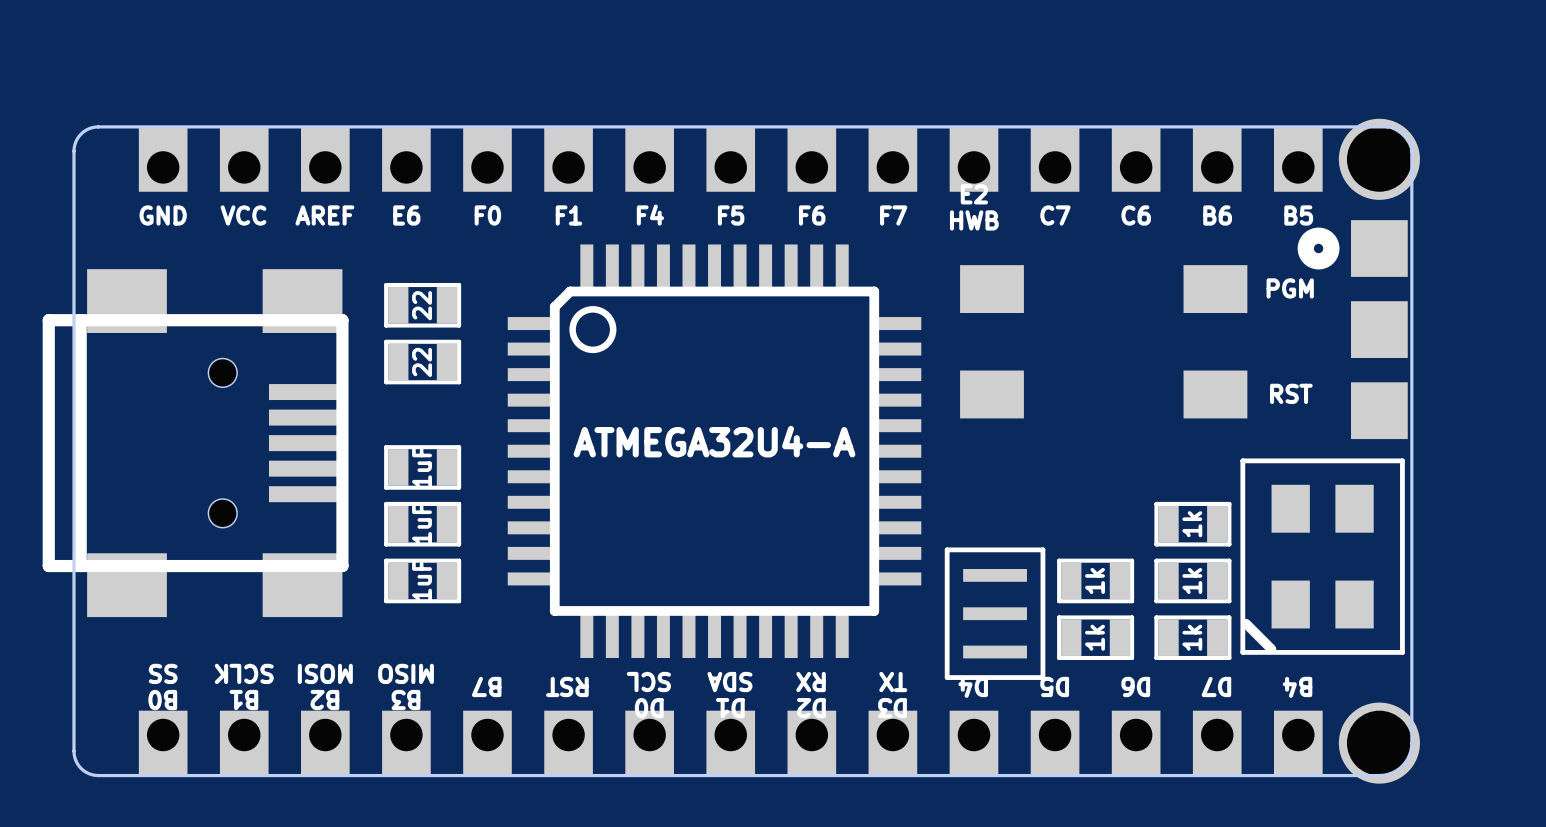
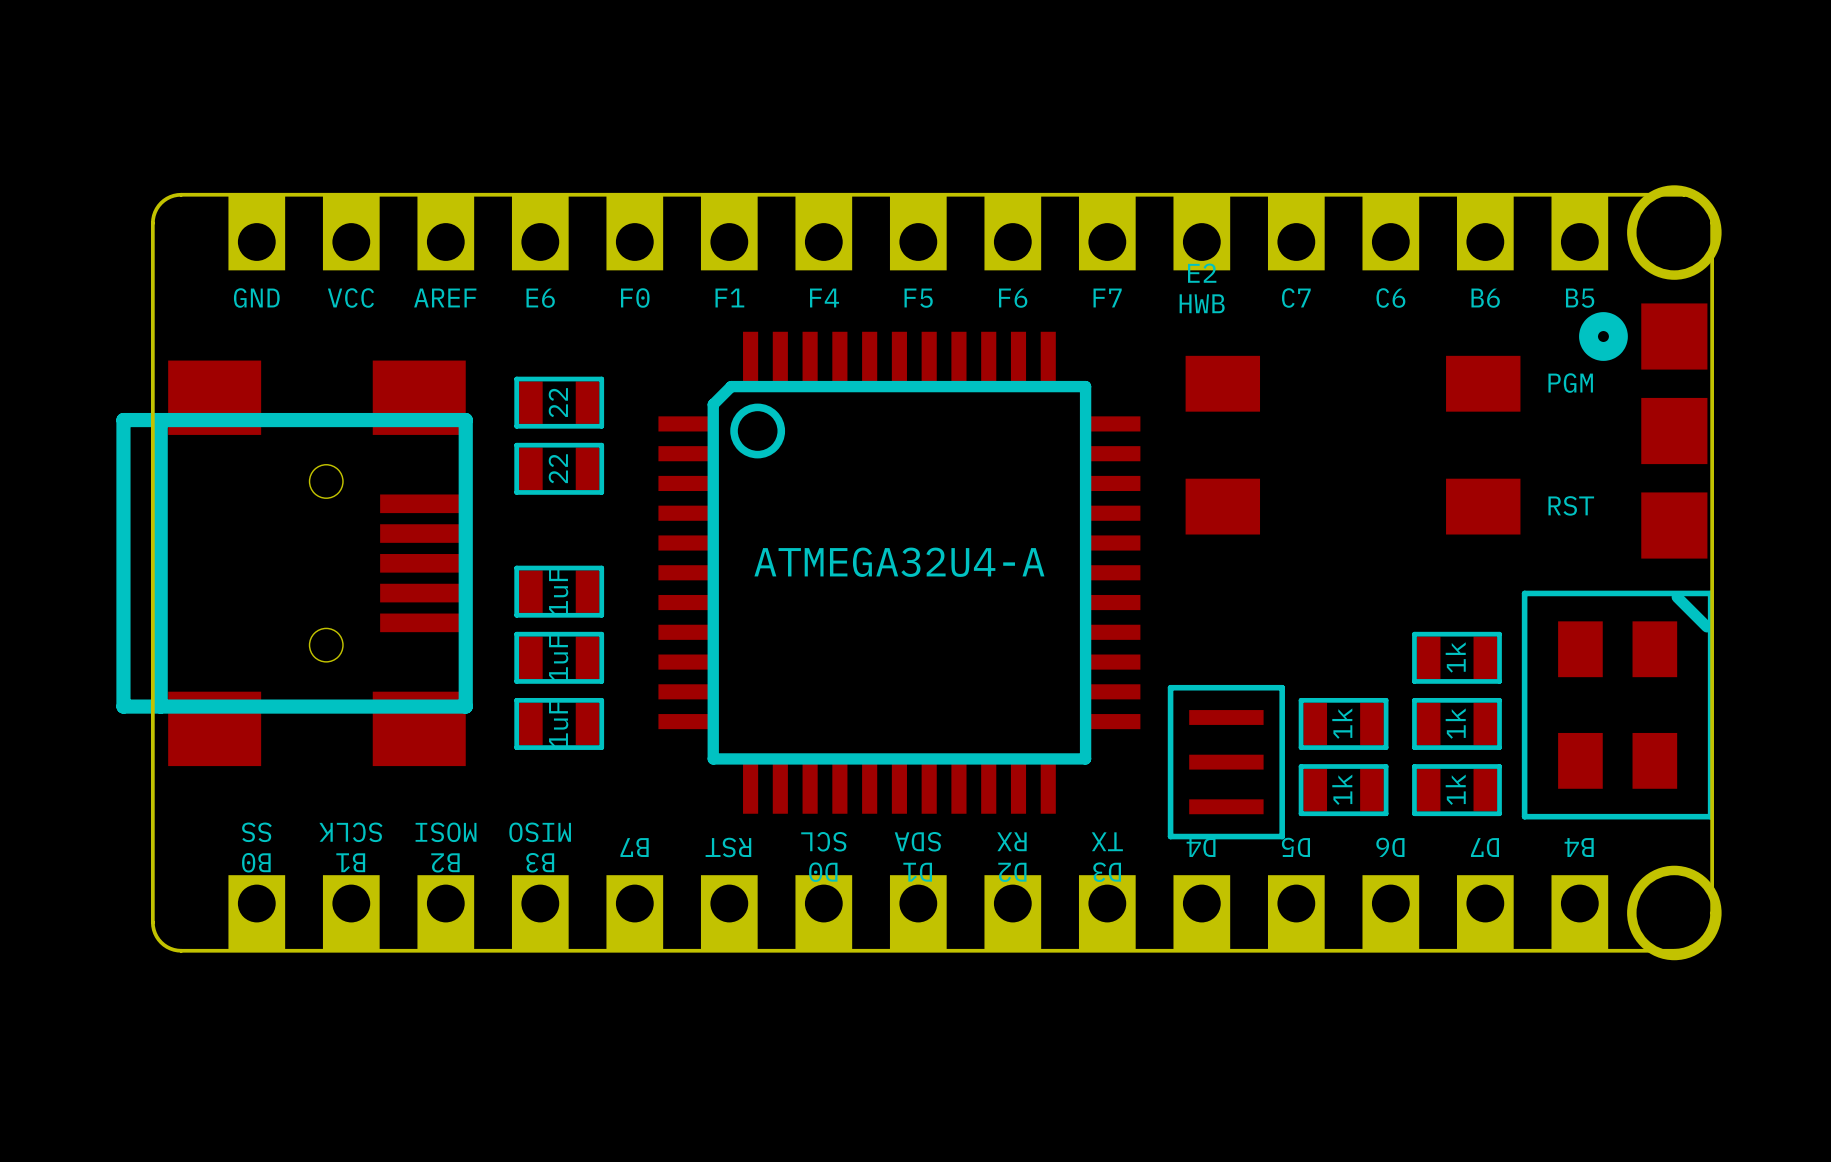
part rotation: 0° (1322, 556) -> 180° (1617, 705)

